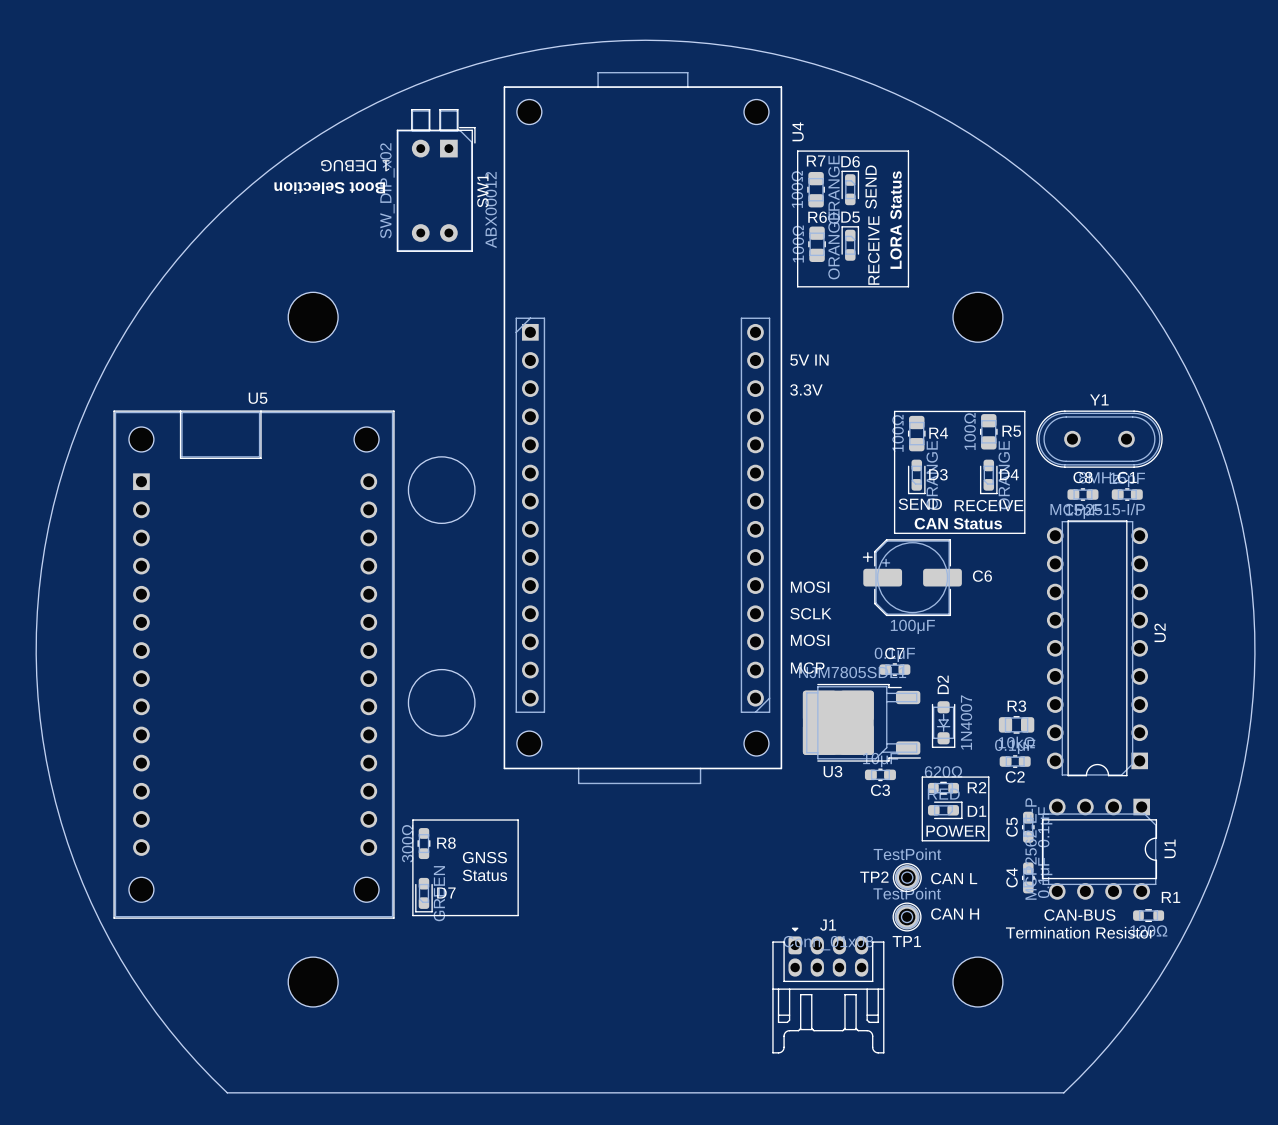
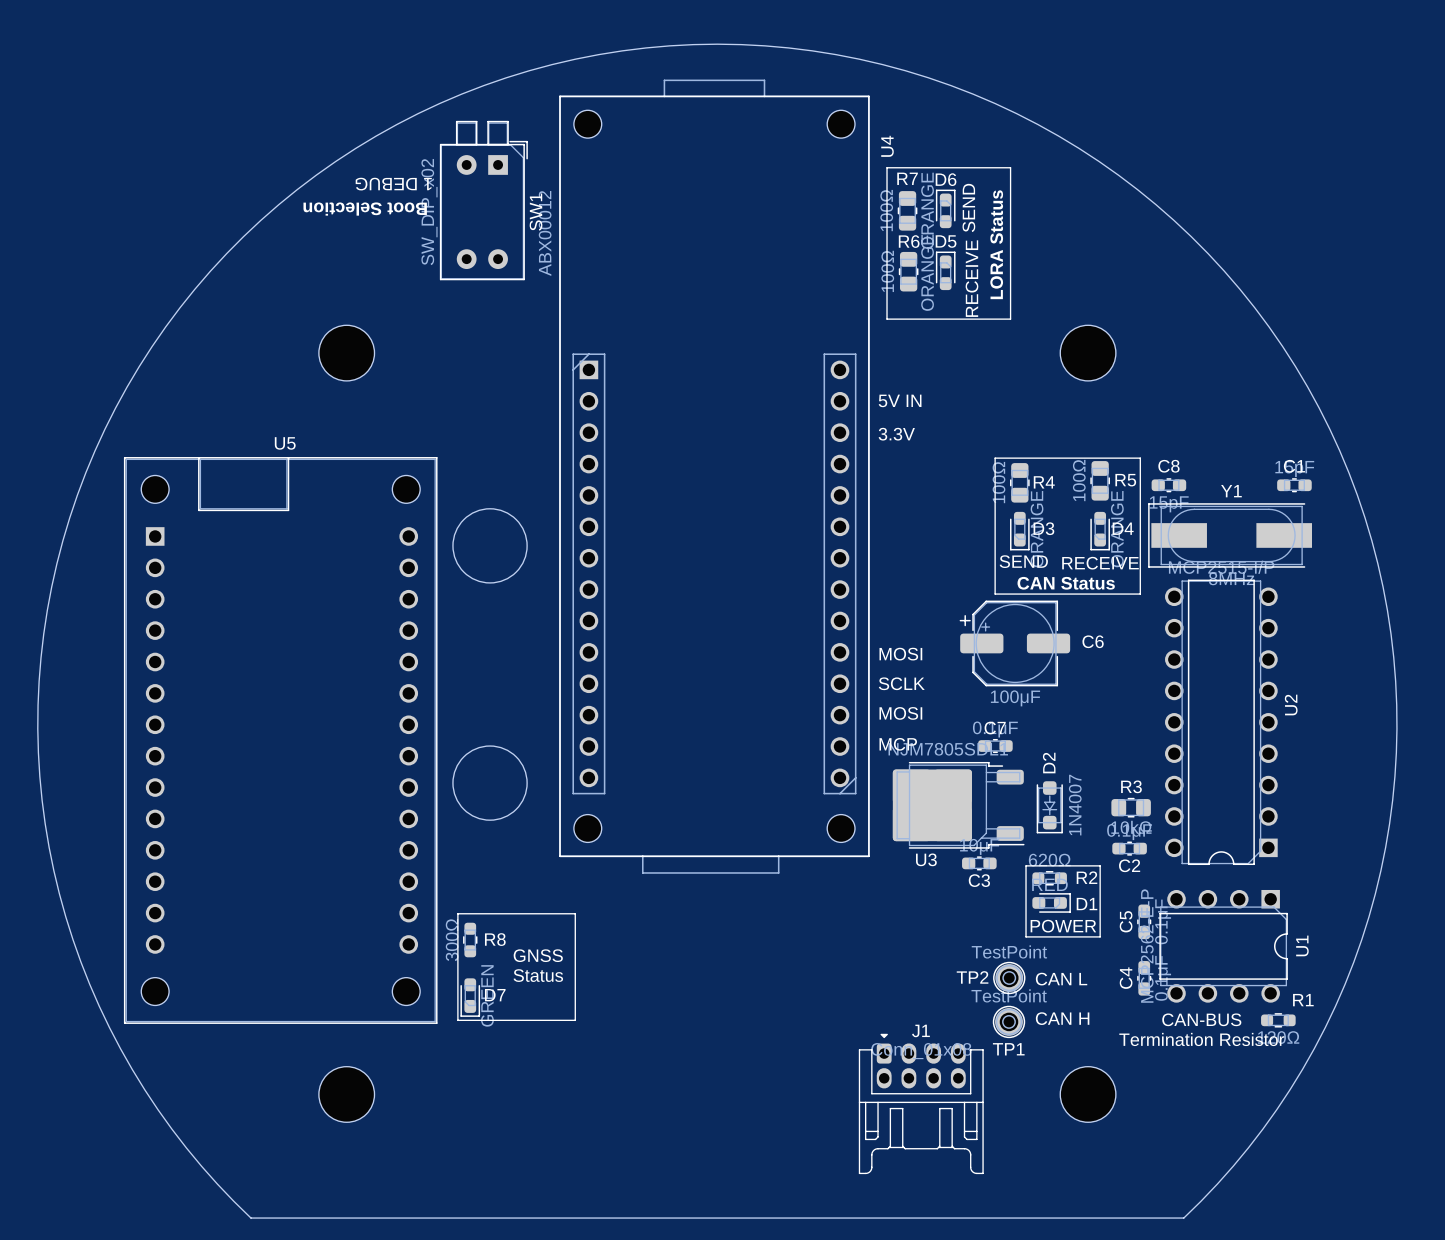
Y1 footprint: [1036, 410, 1163, 468] -> [1148, 503, 1312, 568]
C8 position: (1082, 494) -> (1168, 485)
C1 position: (1127, 494) -> (1294, 485)

